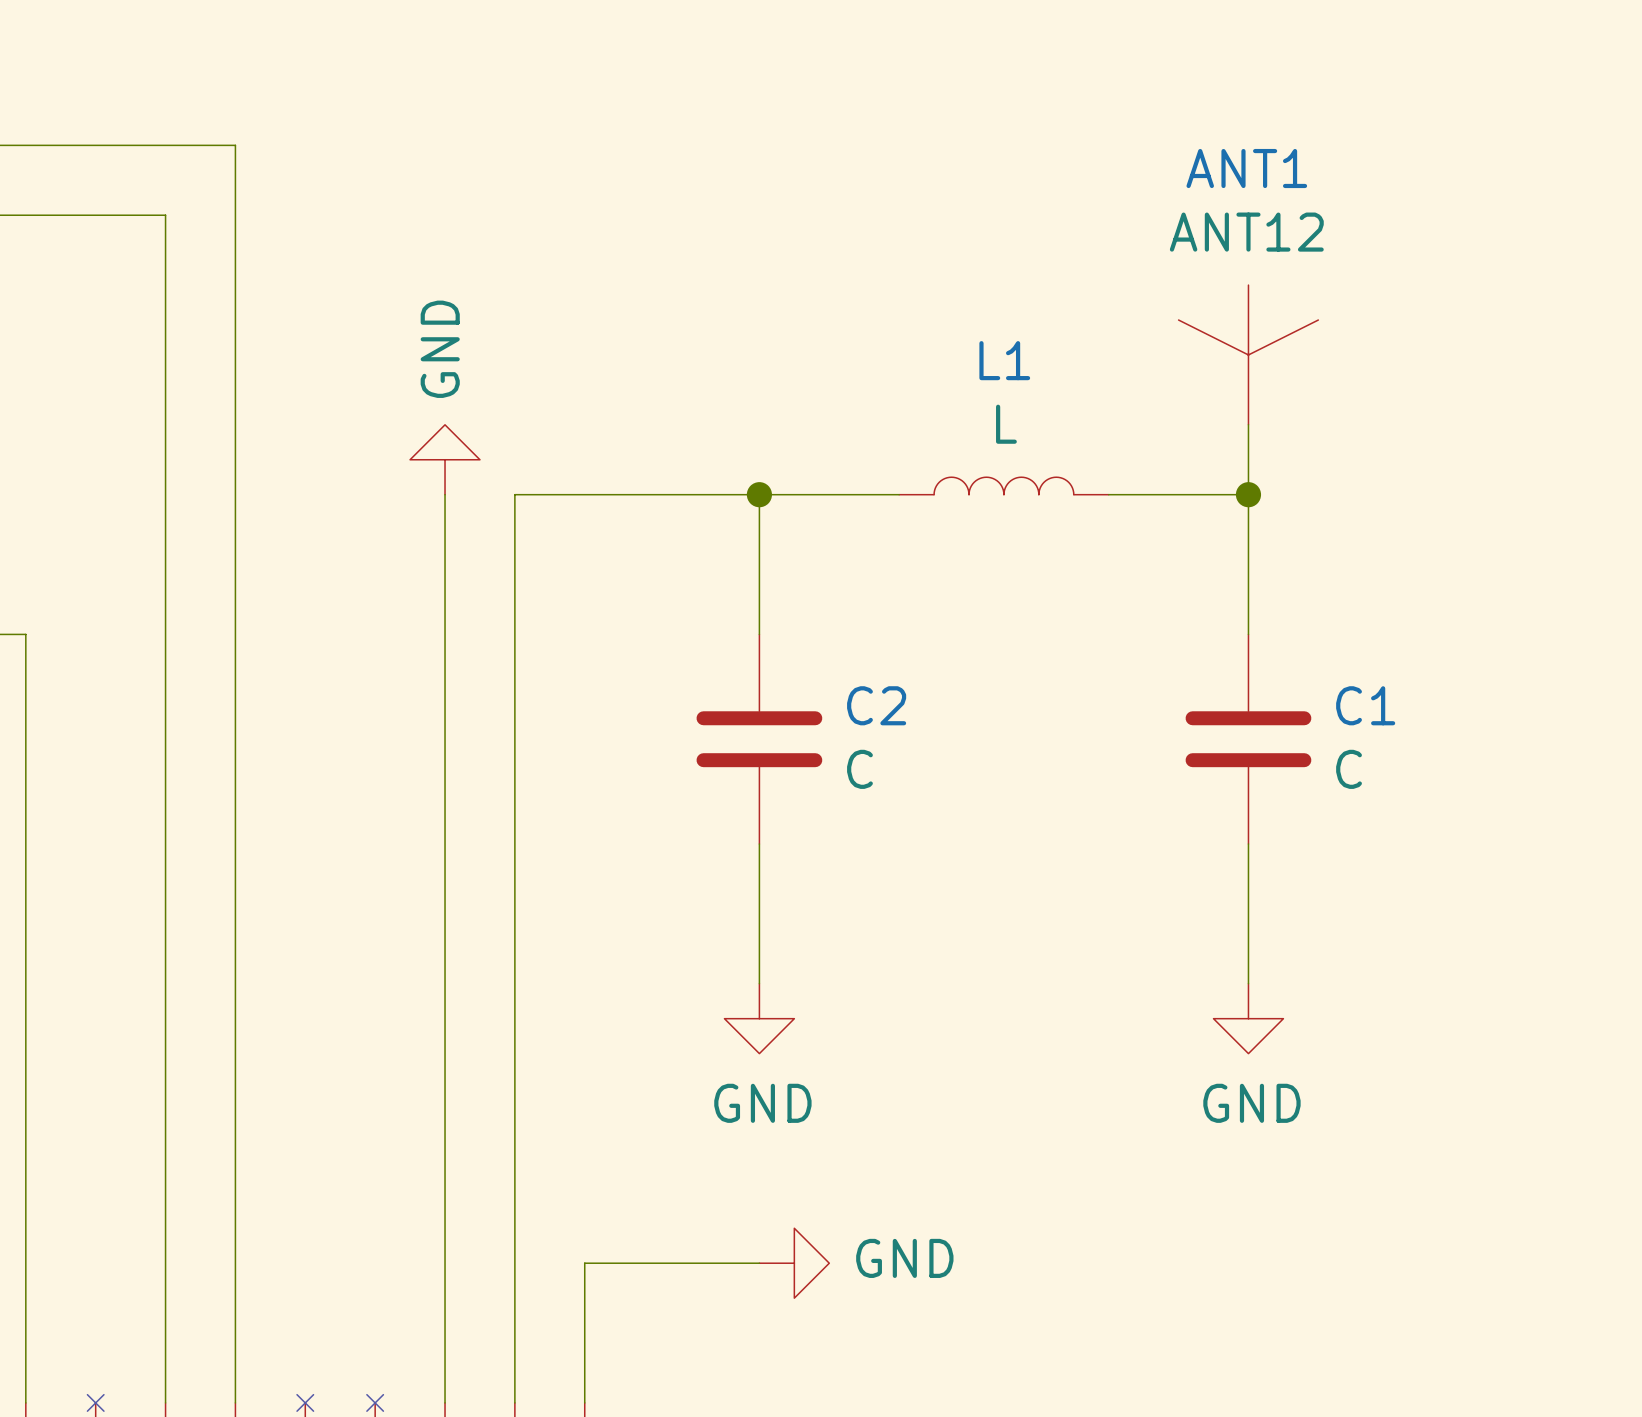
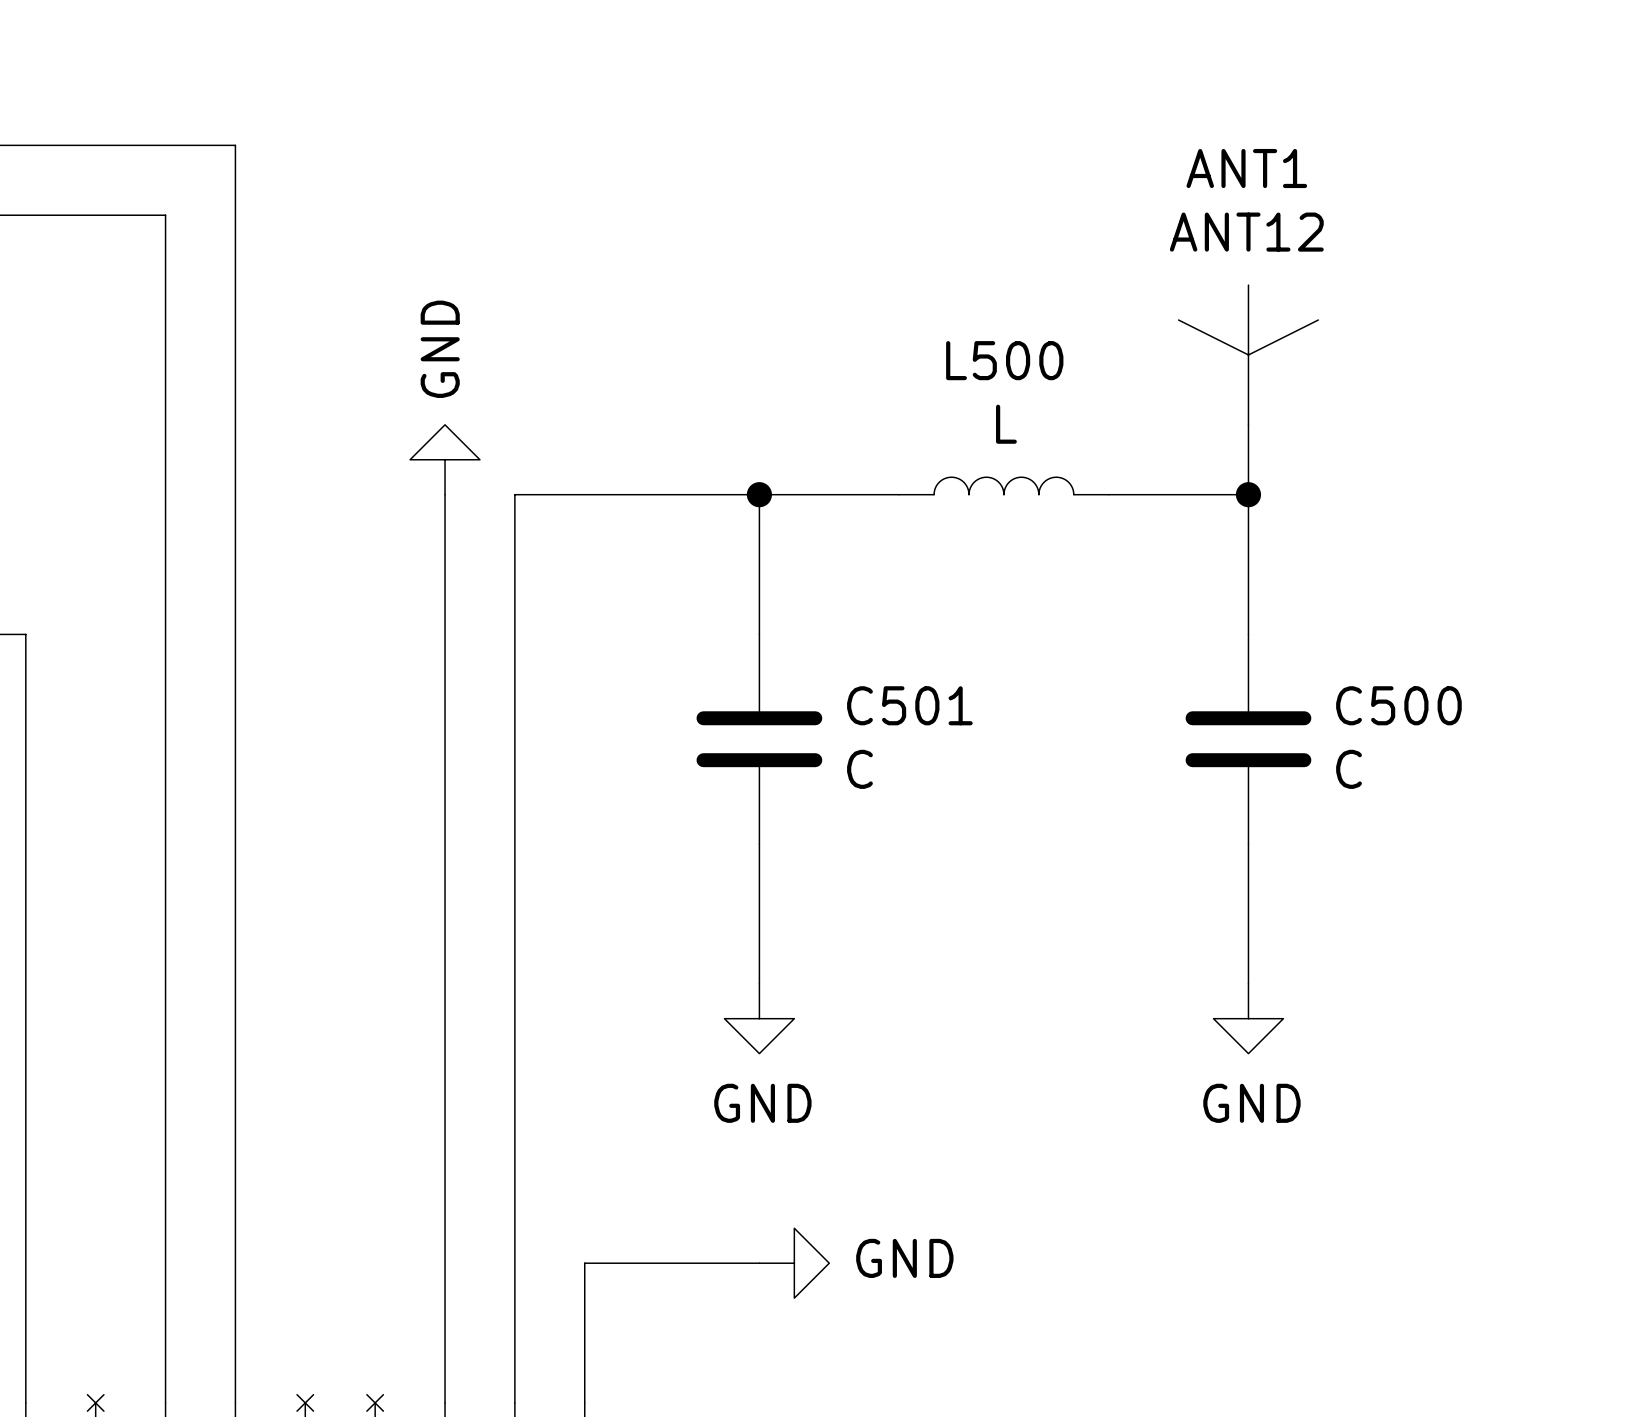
L1 name: L1 (1004, 360) -> L500 (1004, 360)
C2 name: C2 (876, 705) -> C501 (909, 705)
C1 name: C1 (1365, 705) -> C500 (1398, 705)

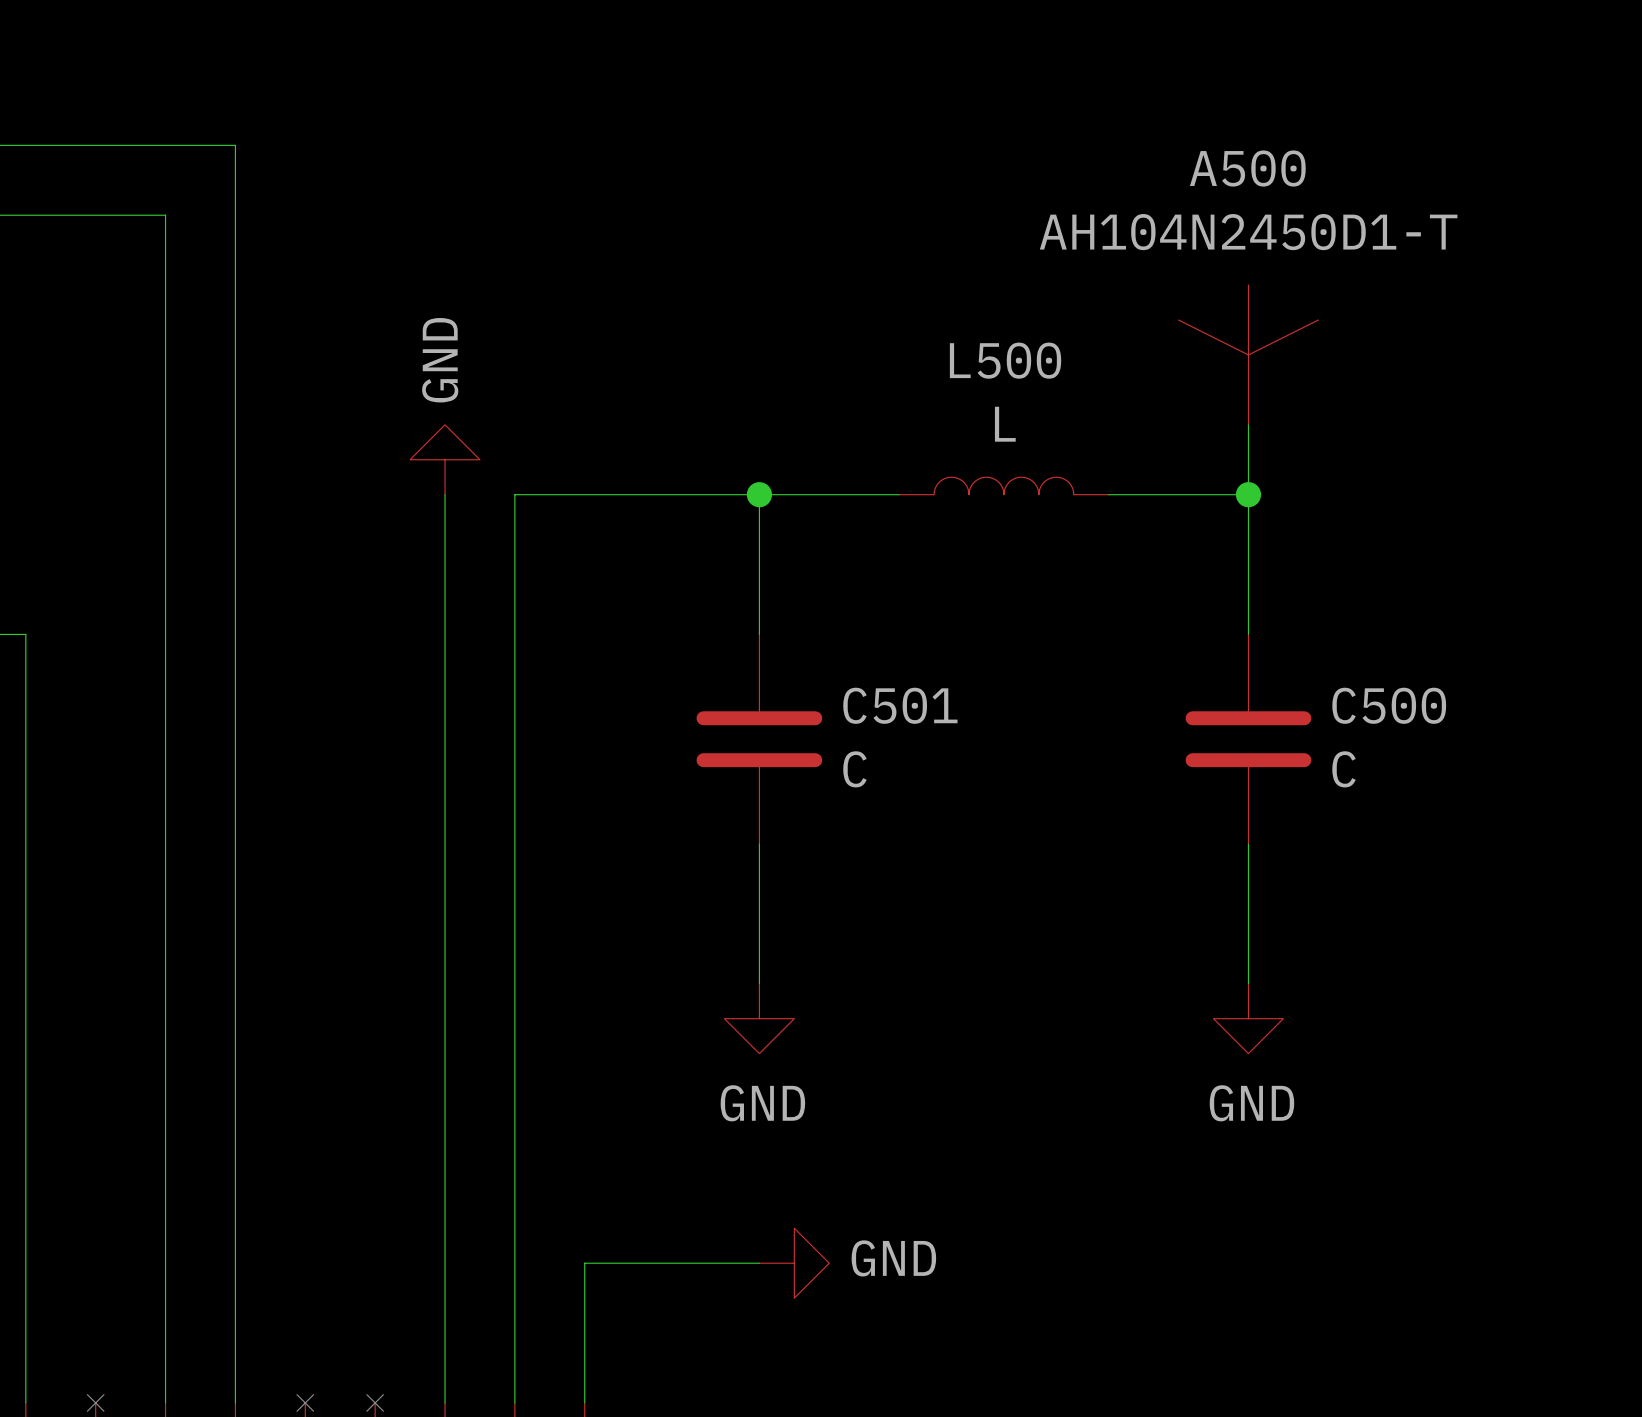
ANT1 name: ANT1 (1246, 168) -> A500 (1247, 168)
ANT1 value: ANT12 (1246, 232) -> AH104N2450D1-T (1248, 232)

